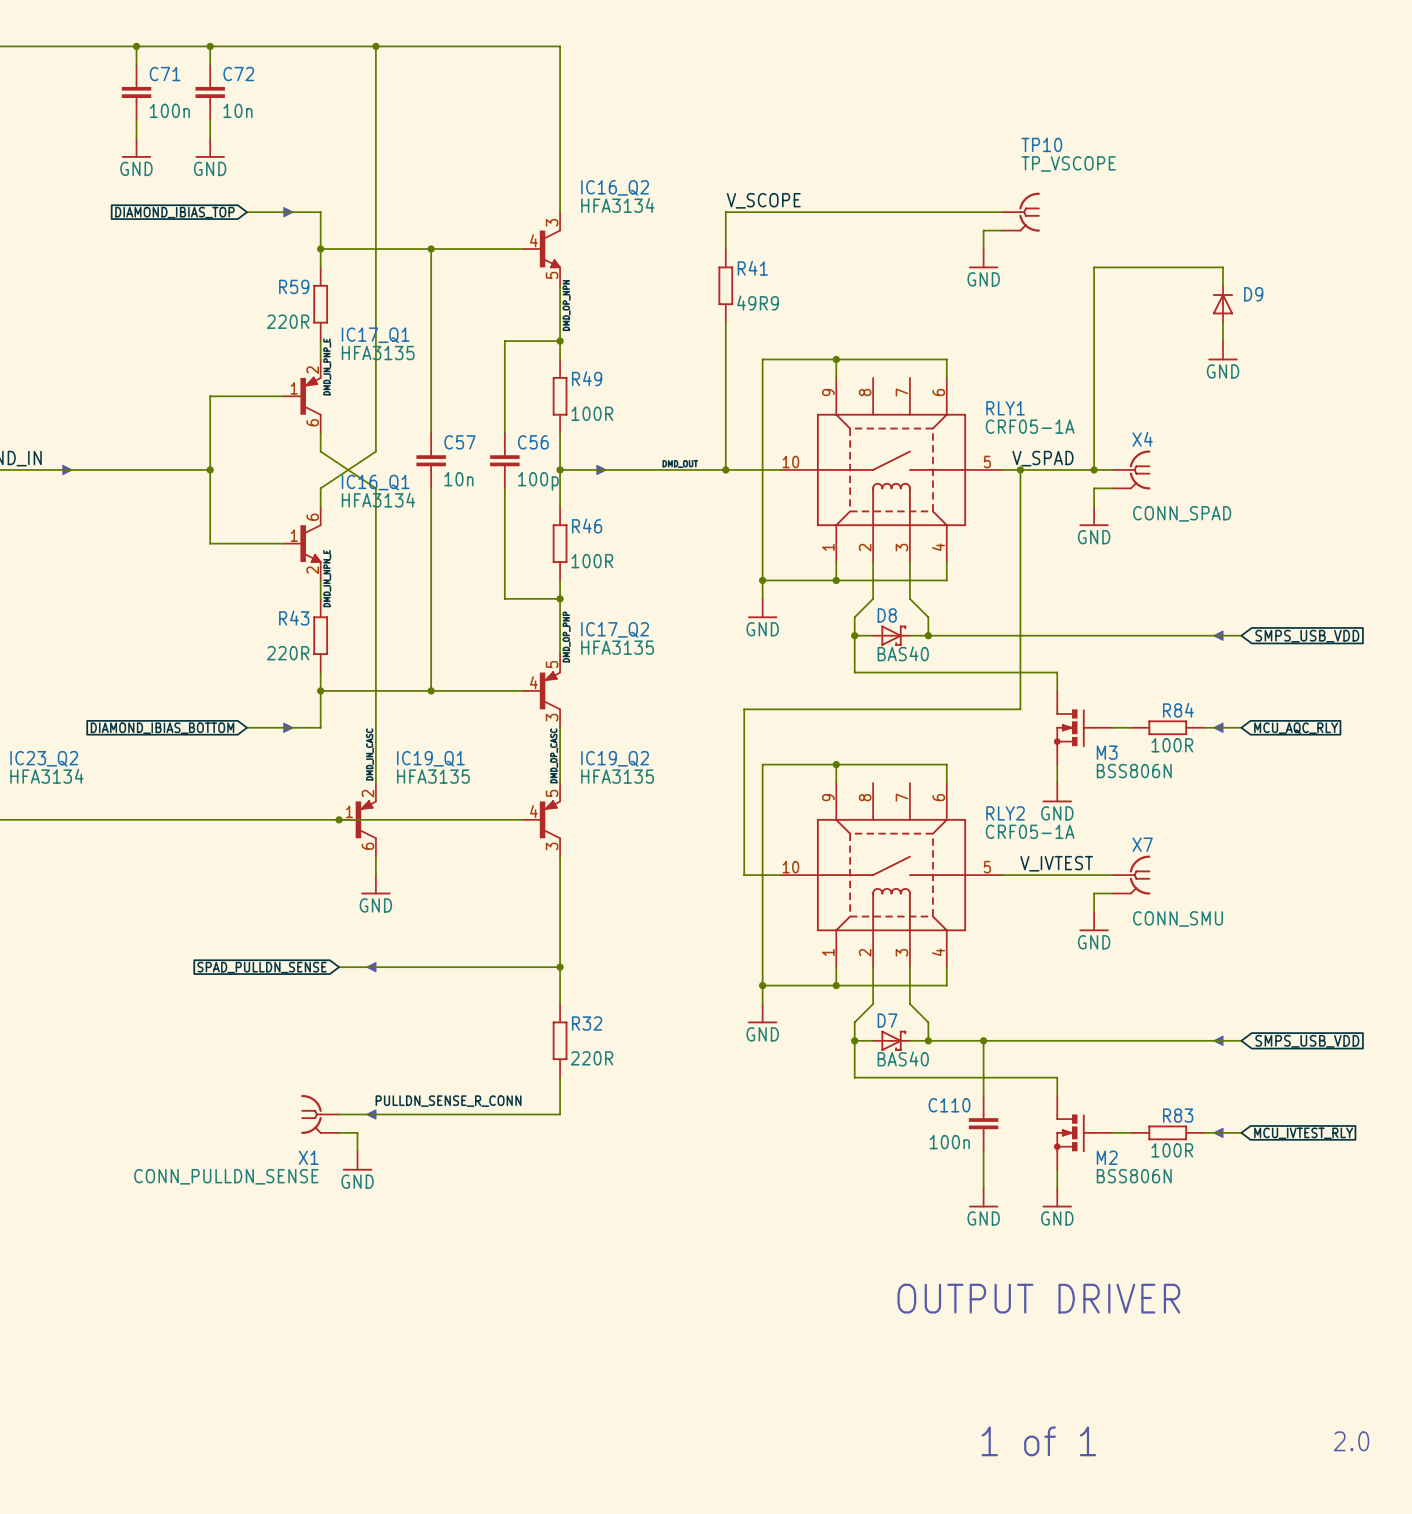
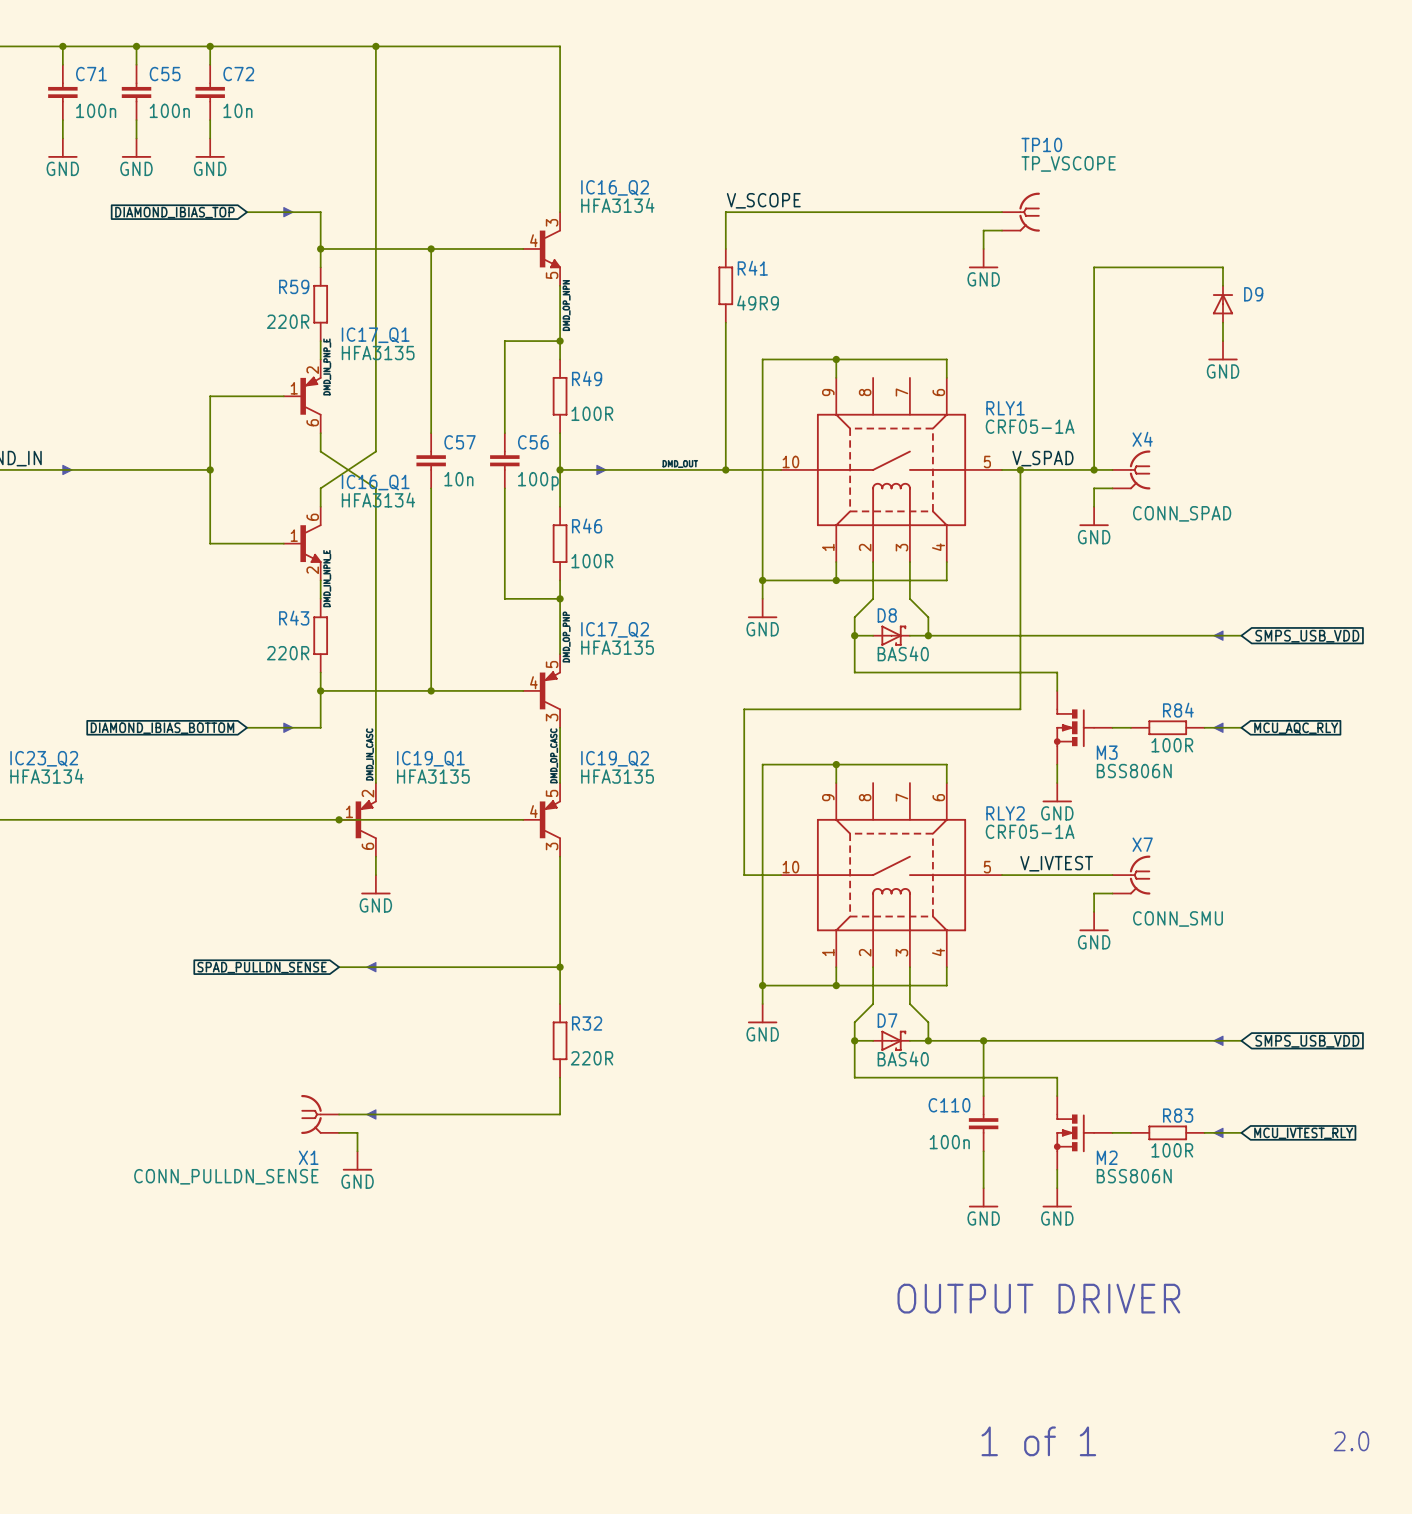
wire: none -> (62, 46) (62, 64)
junction: none -> (62, 46)
C71 name: C71 (165, 74) -> C55 (165, 74)
C71: none -> 100n (62, 92)
wire: none -> (62, 120) (62, 138)
power symbol: none -> GND (62, 148)
label: PULLDN_SENSE_R_CONN (448, 1101) -> none

